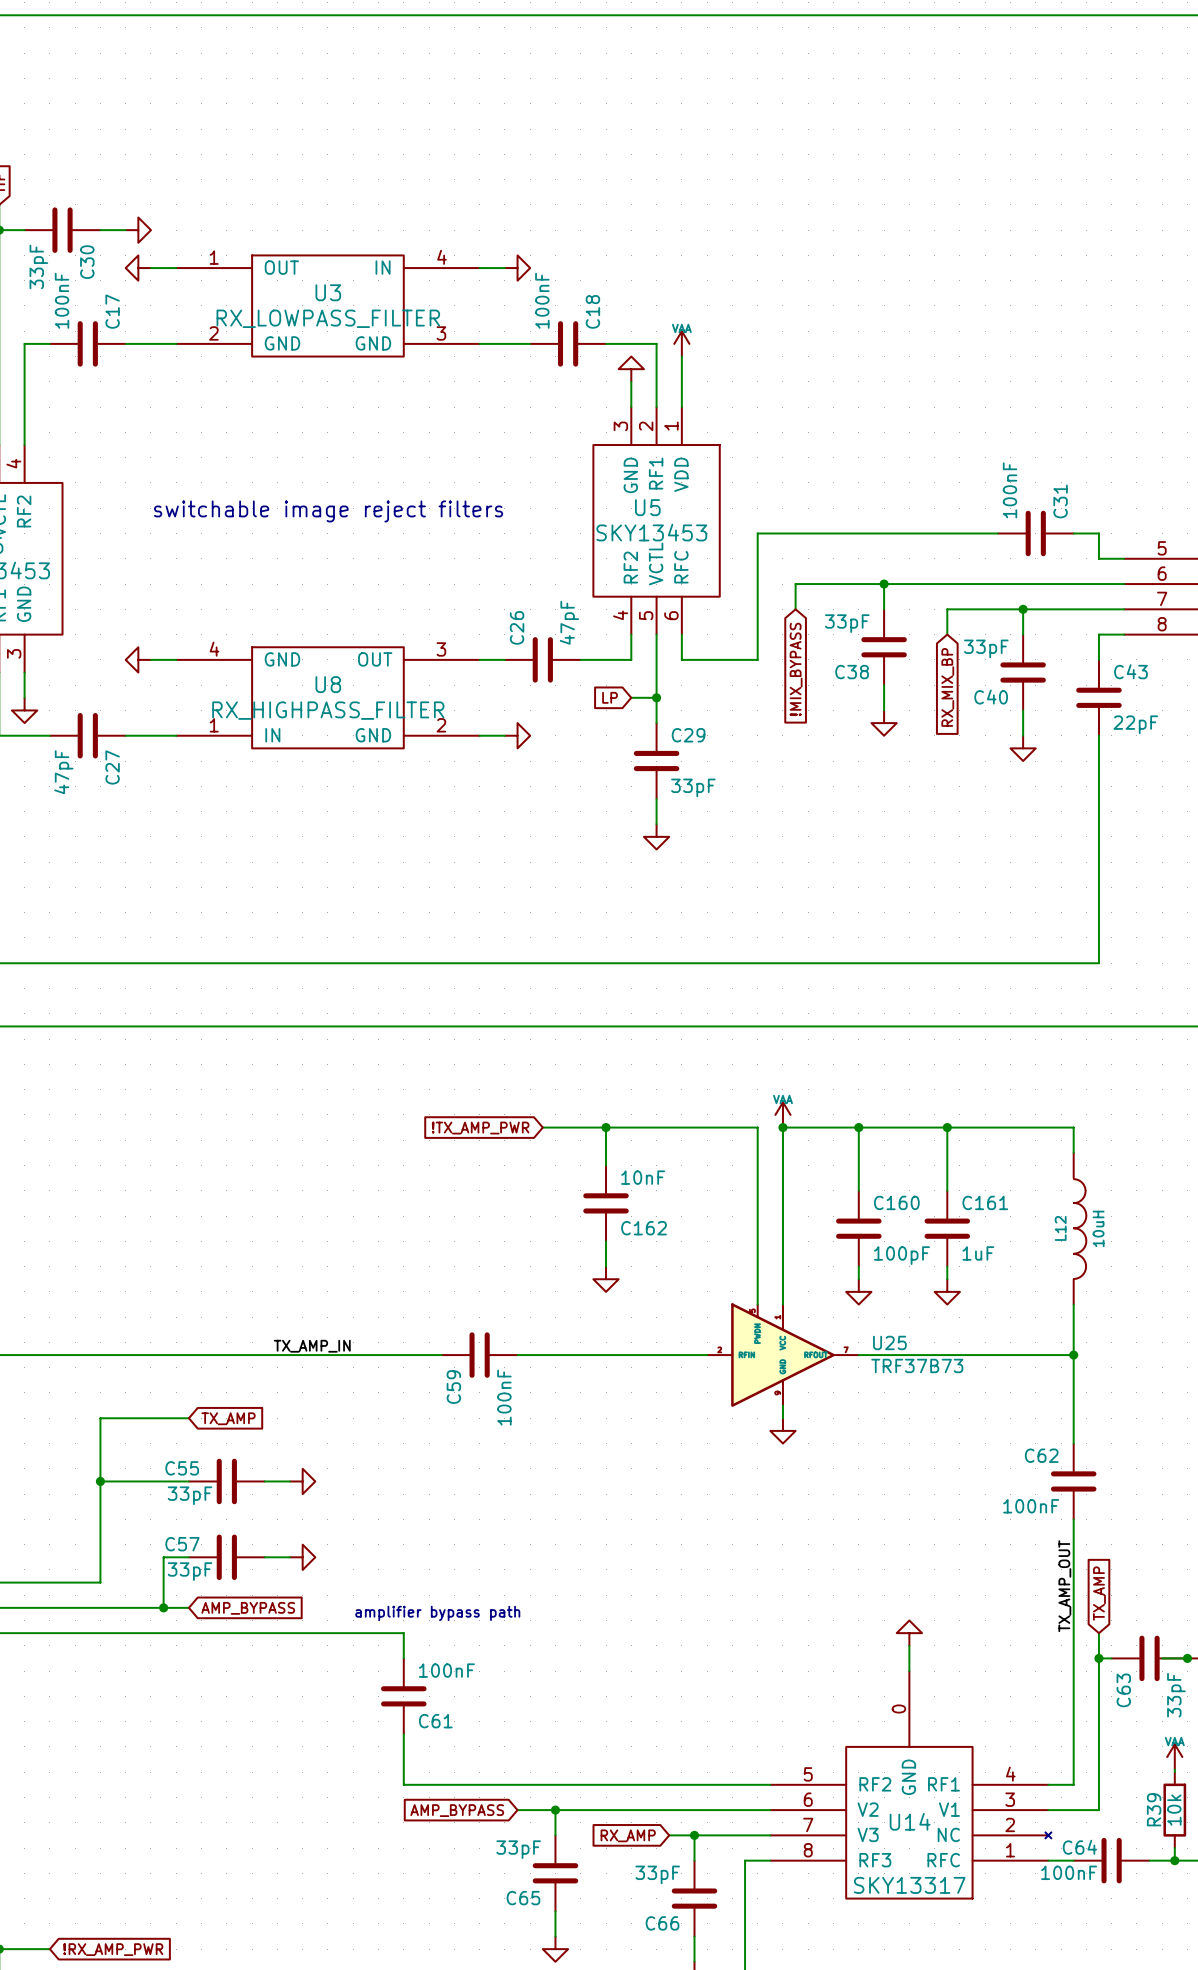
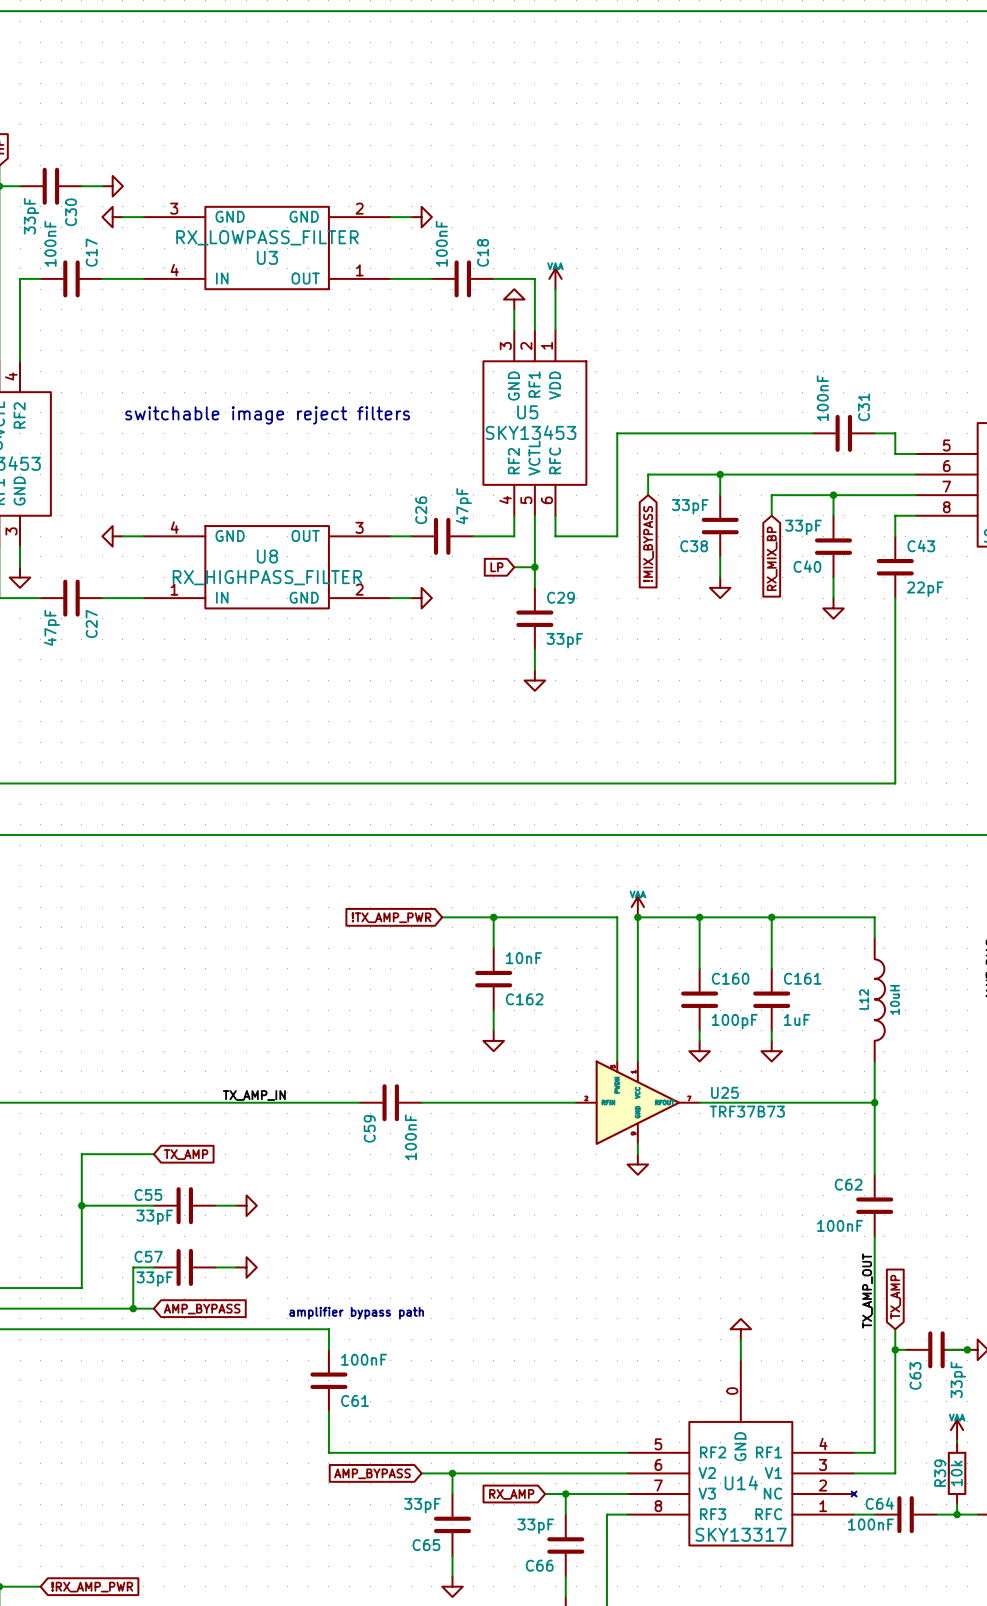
U3 rotation: 0° (327, 305) -> 180° (267, 248)

